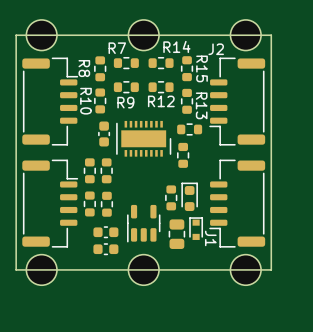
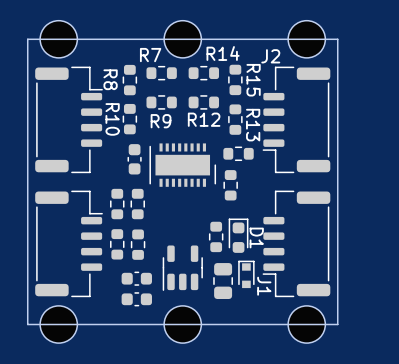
D1 name: none -> D1 (256, 237)

